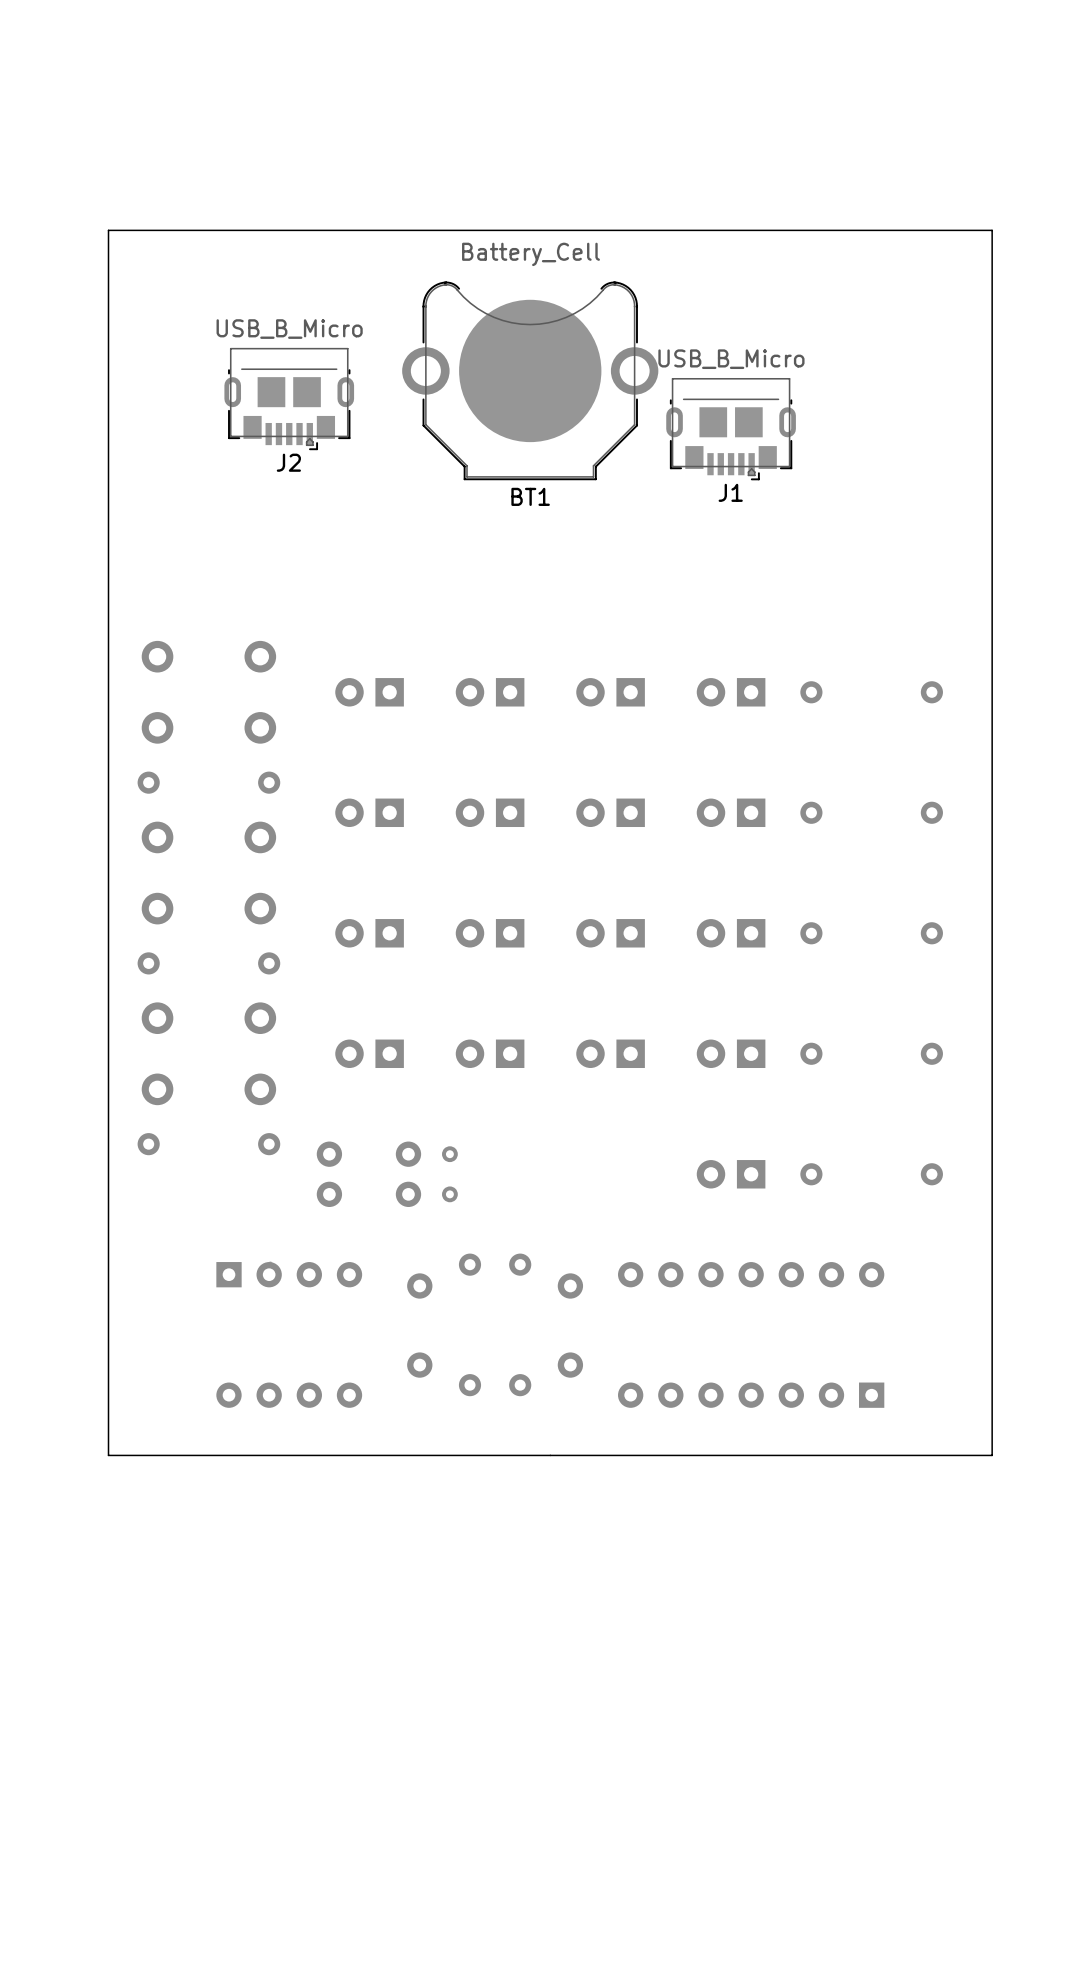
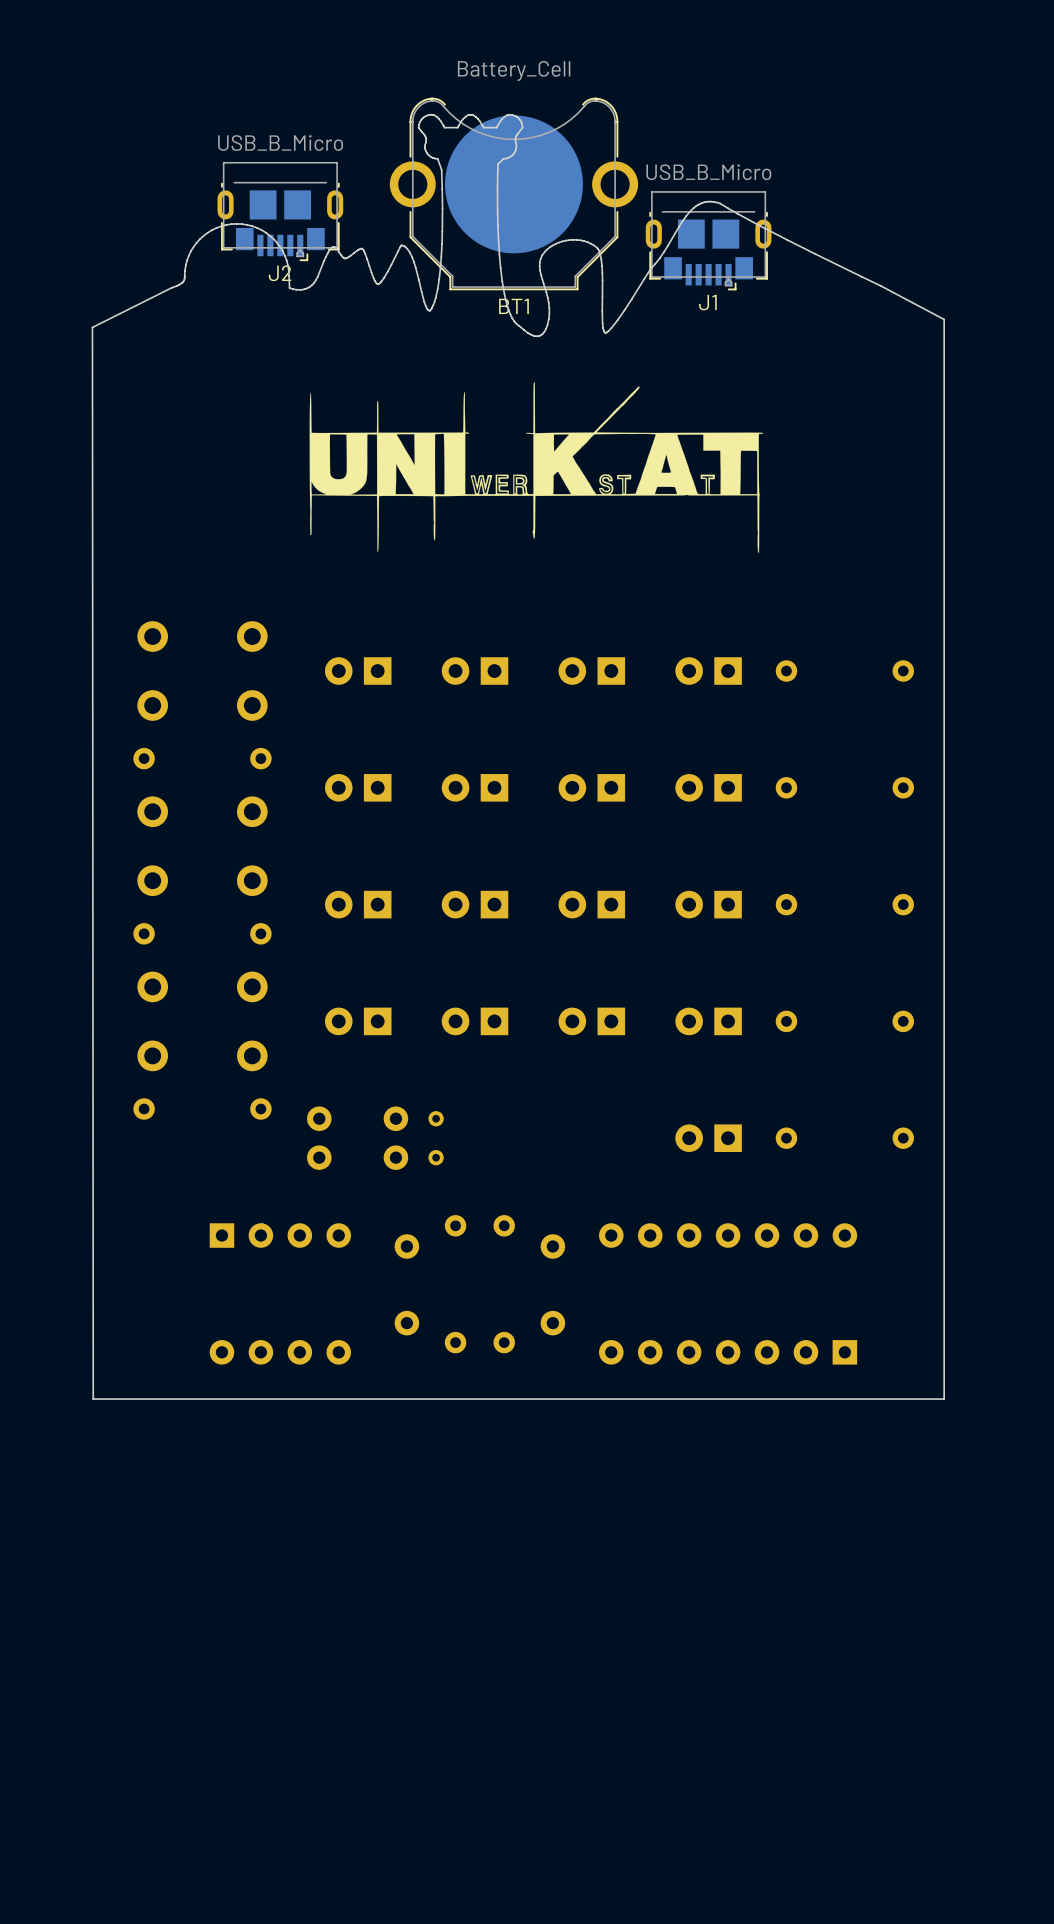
board edge: (992, 230) (108, 230) (108, 1455) (992, 1455) (992, 230) -> (509, 114) (518, 118) (522, 127) (516, 136) (514, 153) (497, 164) (497, 224) (500, 267) (504, 294) (510, 314) (516, 324) (531, 335) (538, 336) (542, 334) (548, 318) (548, 302) (539, 266) (542, 255) (549, 247) (562, 241) (576, 239) (587, 242) (597, 248) (602, 265) (602, 323) (605, 332) (624, 310) (686, 216) (696, 206) (708, 201) (720, 203) (760, 226) (944, 319) (944, 1399) (93, 1399) (92, 327) (181, 283) (184, 280) (188, 255) (199, 239) (216, 227) (236, 223) (257, 227) (277, 242) (286, 260) (289, 288) (296, 289) (307, 288) (314, 282) (327, 253) (333, 246) (345, 258) (362, 248) (374, 280) (379, 283) (400, 246) (402, 245) (411, 256) (424, 302) (427, 308) (430, 310) (435, 298) (440, 267) (441, 169) (437, 158) (430, 156) (425, 150) (425, 137) (418, 127) (419, 122) (424, 116) (432, 114) (438, 118) (444, 127) (457, 127) (463, 118) (470, 114) (477, 118) (483, 127) (496, 127) (502, 118) (509, 114)
BT1 position: (530, 380) -> (513, 193)
drawing: none -> [309, 382, 763, 553]
J2 position: (289, 399) -> (280, 211)
J1 position: (731, 429) -> (708, 240)

